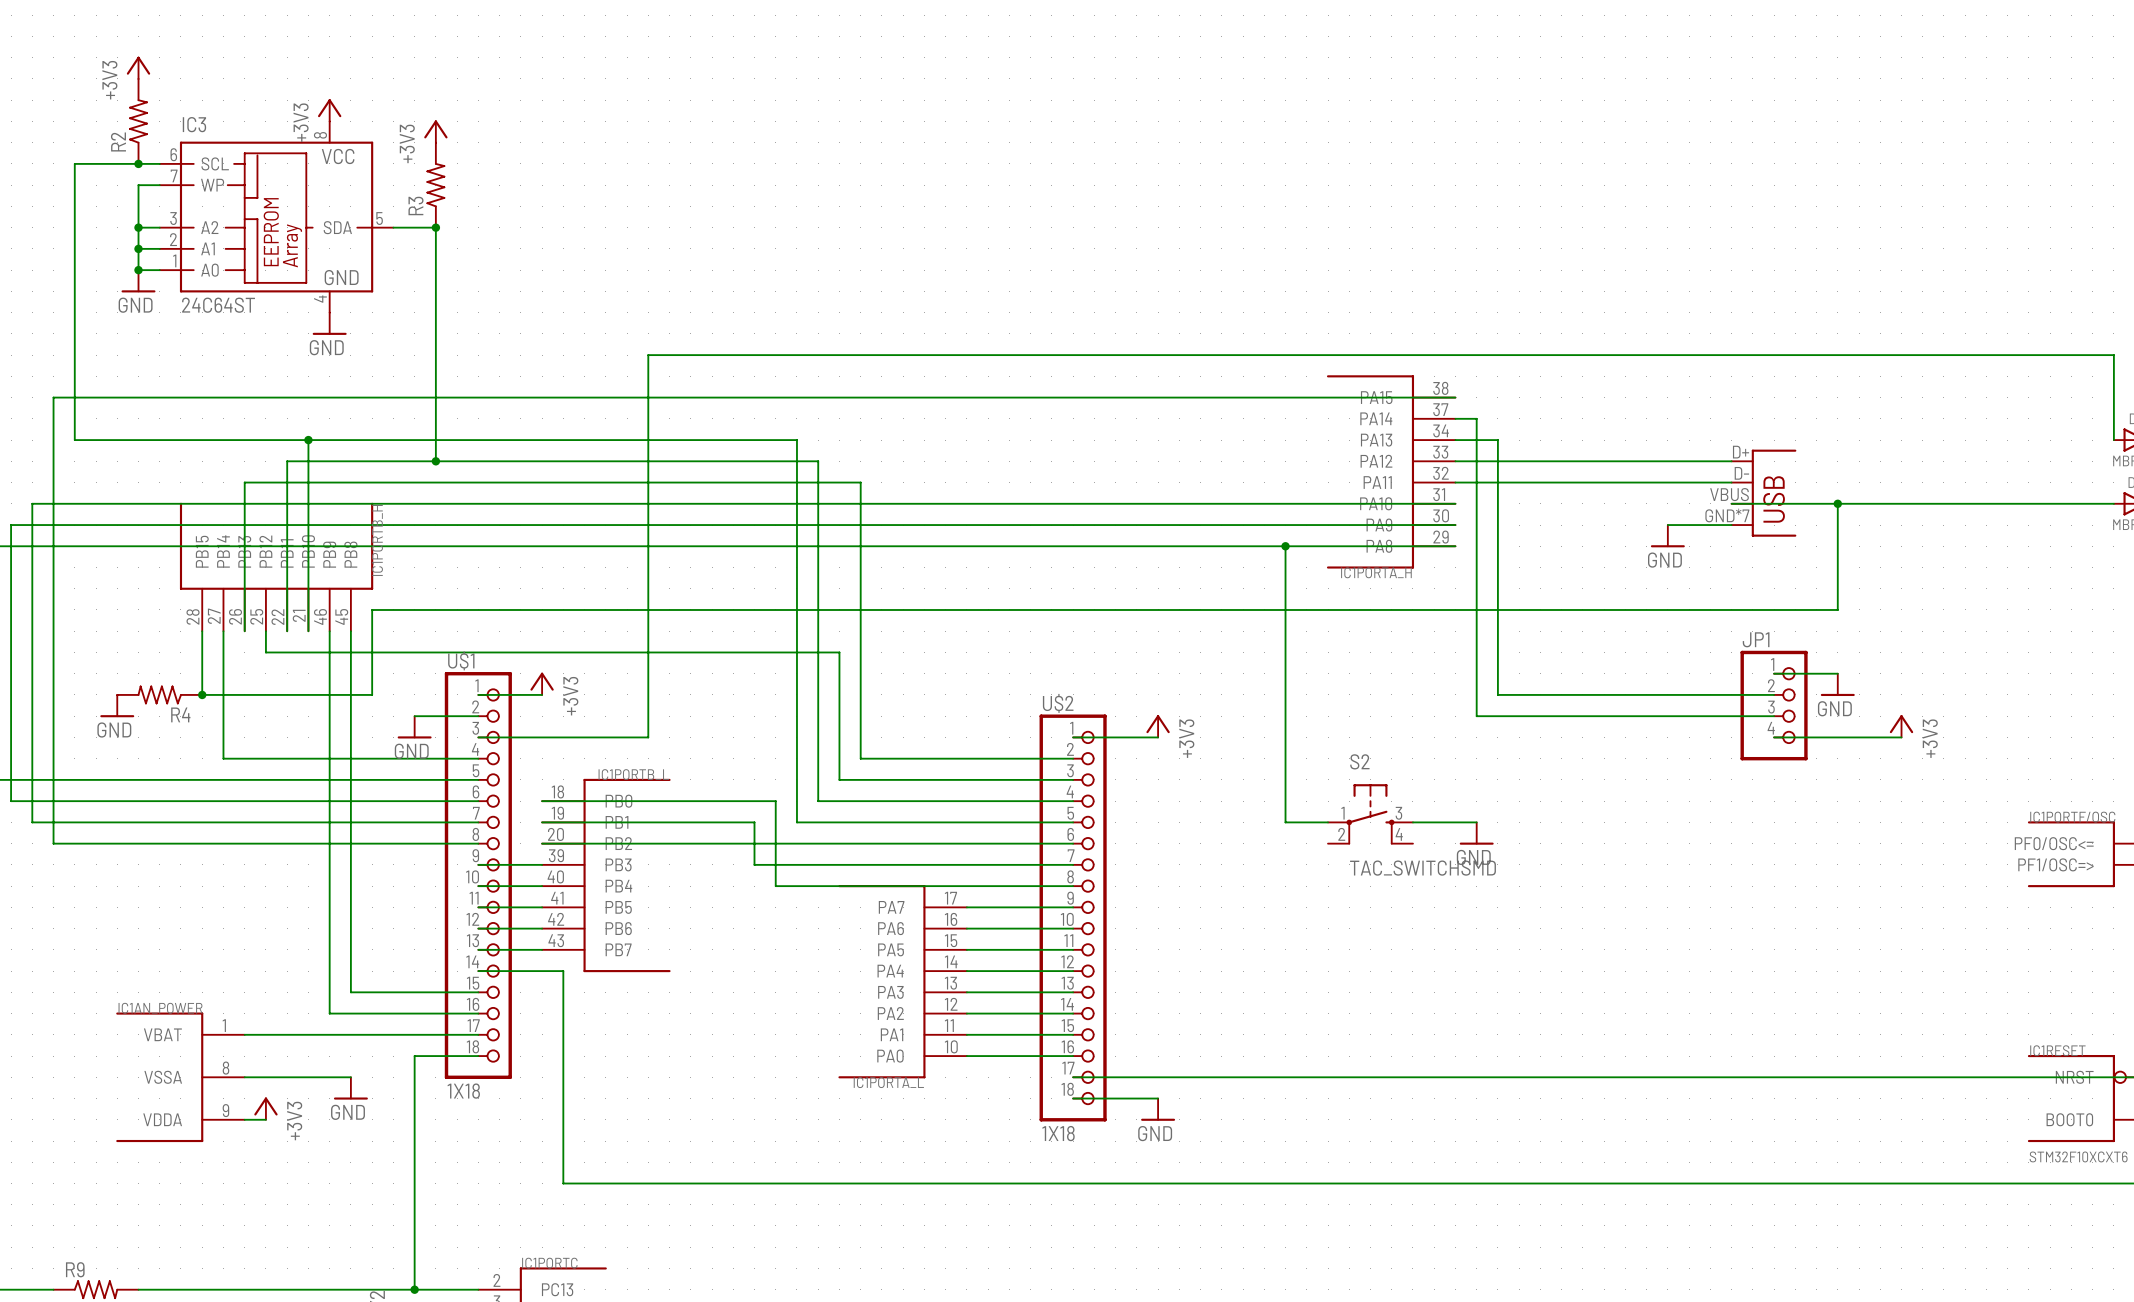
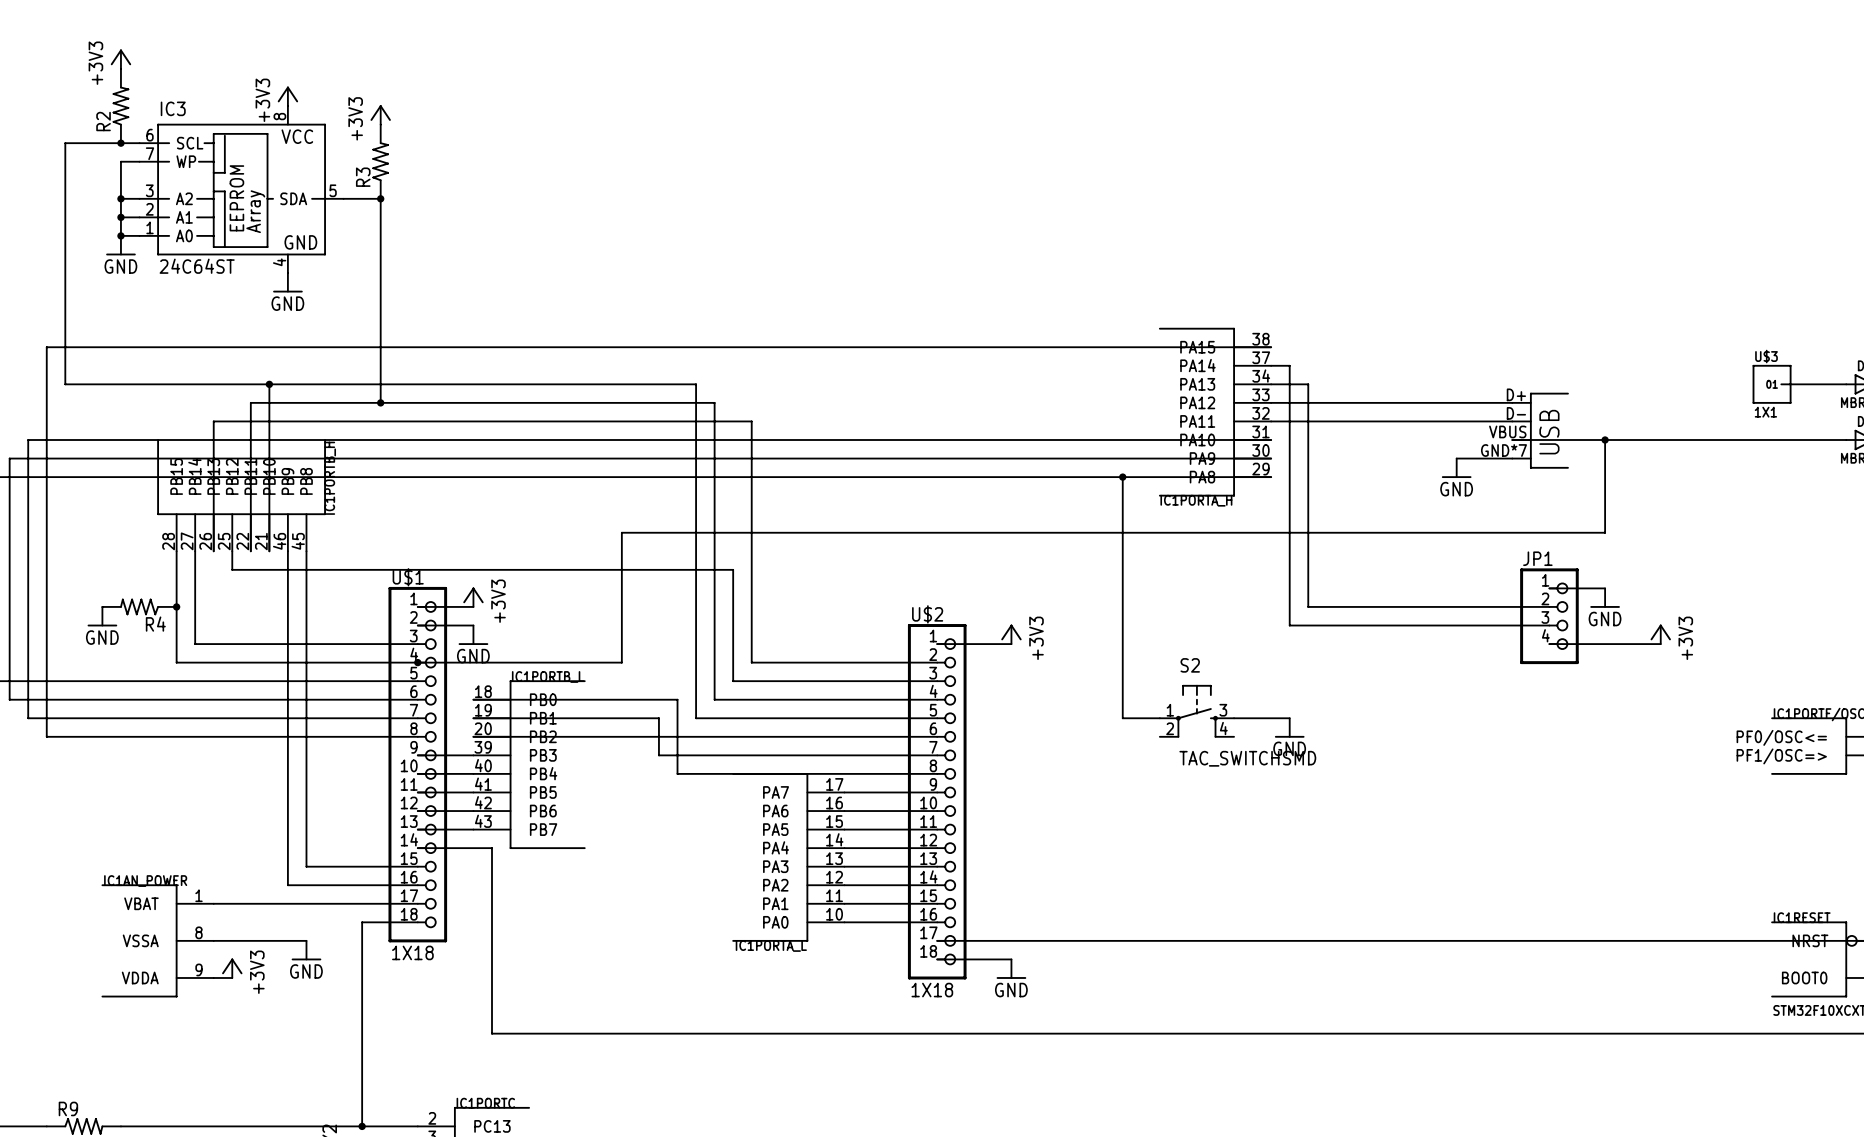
U$3: none -> 1X1 (1772, 384)
wire: (2113, 440) (2113, 355) (648, 355) (648, 737) (478, 737) -> (1846, 384) (1790, 384)
wire: (712, 609) (372, 609) (372, 694) (202, 694) -> (621, 532) (621, 662) (417, 662)
wire: (414, 716) (478, 716) -> (473, 625) (417, 625)
power symbol position: GND (414, 727) -> GND (473, 635)
wire: (223, 737) (223, 758) -> (176, 606) (176, 662) (195, 662)
wire: none -> (195, 644) (417, 644)
junction: none -> (417, 662)

